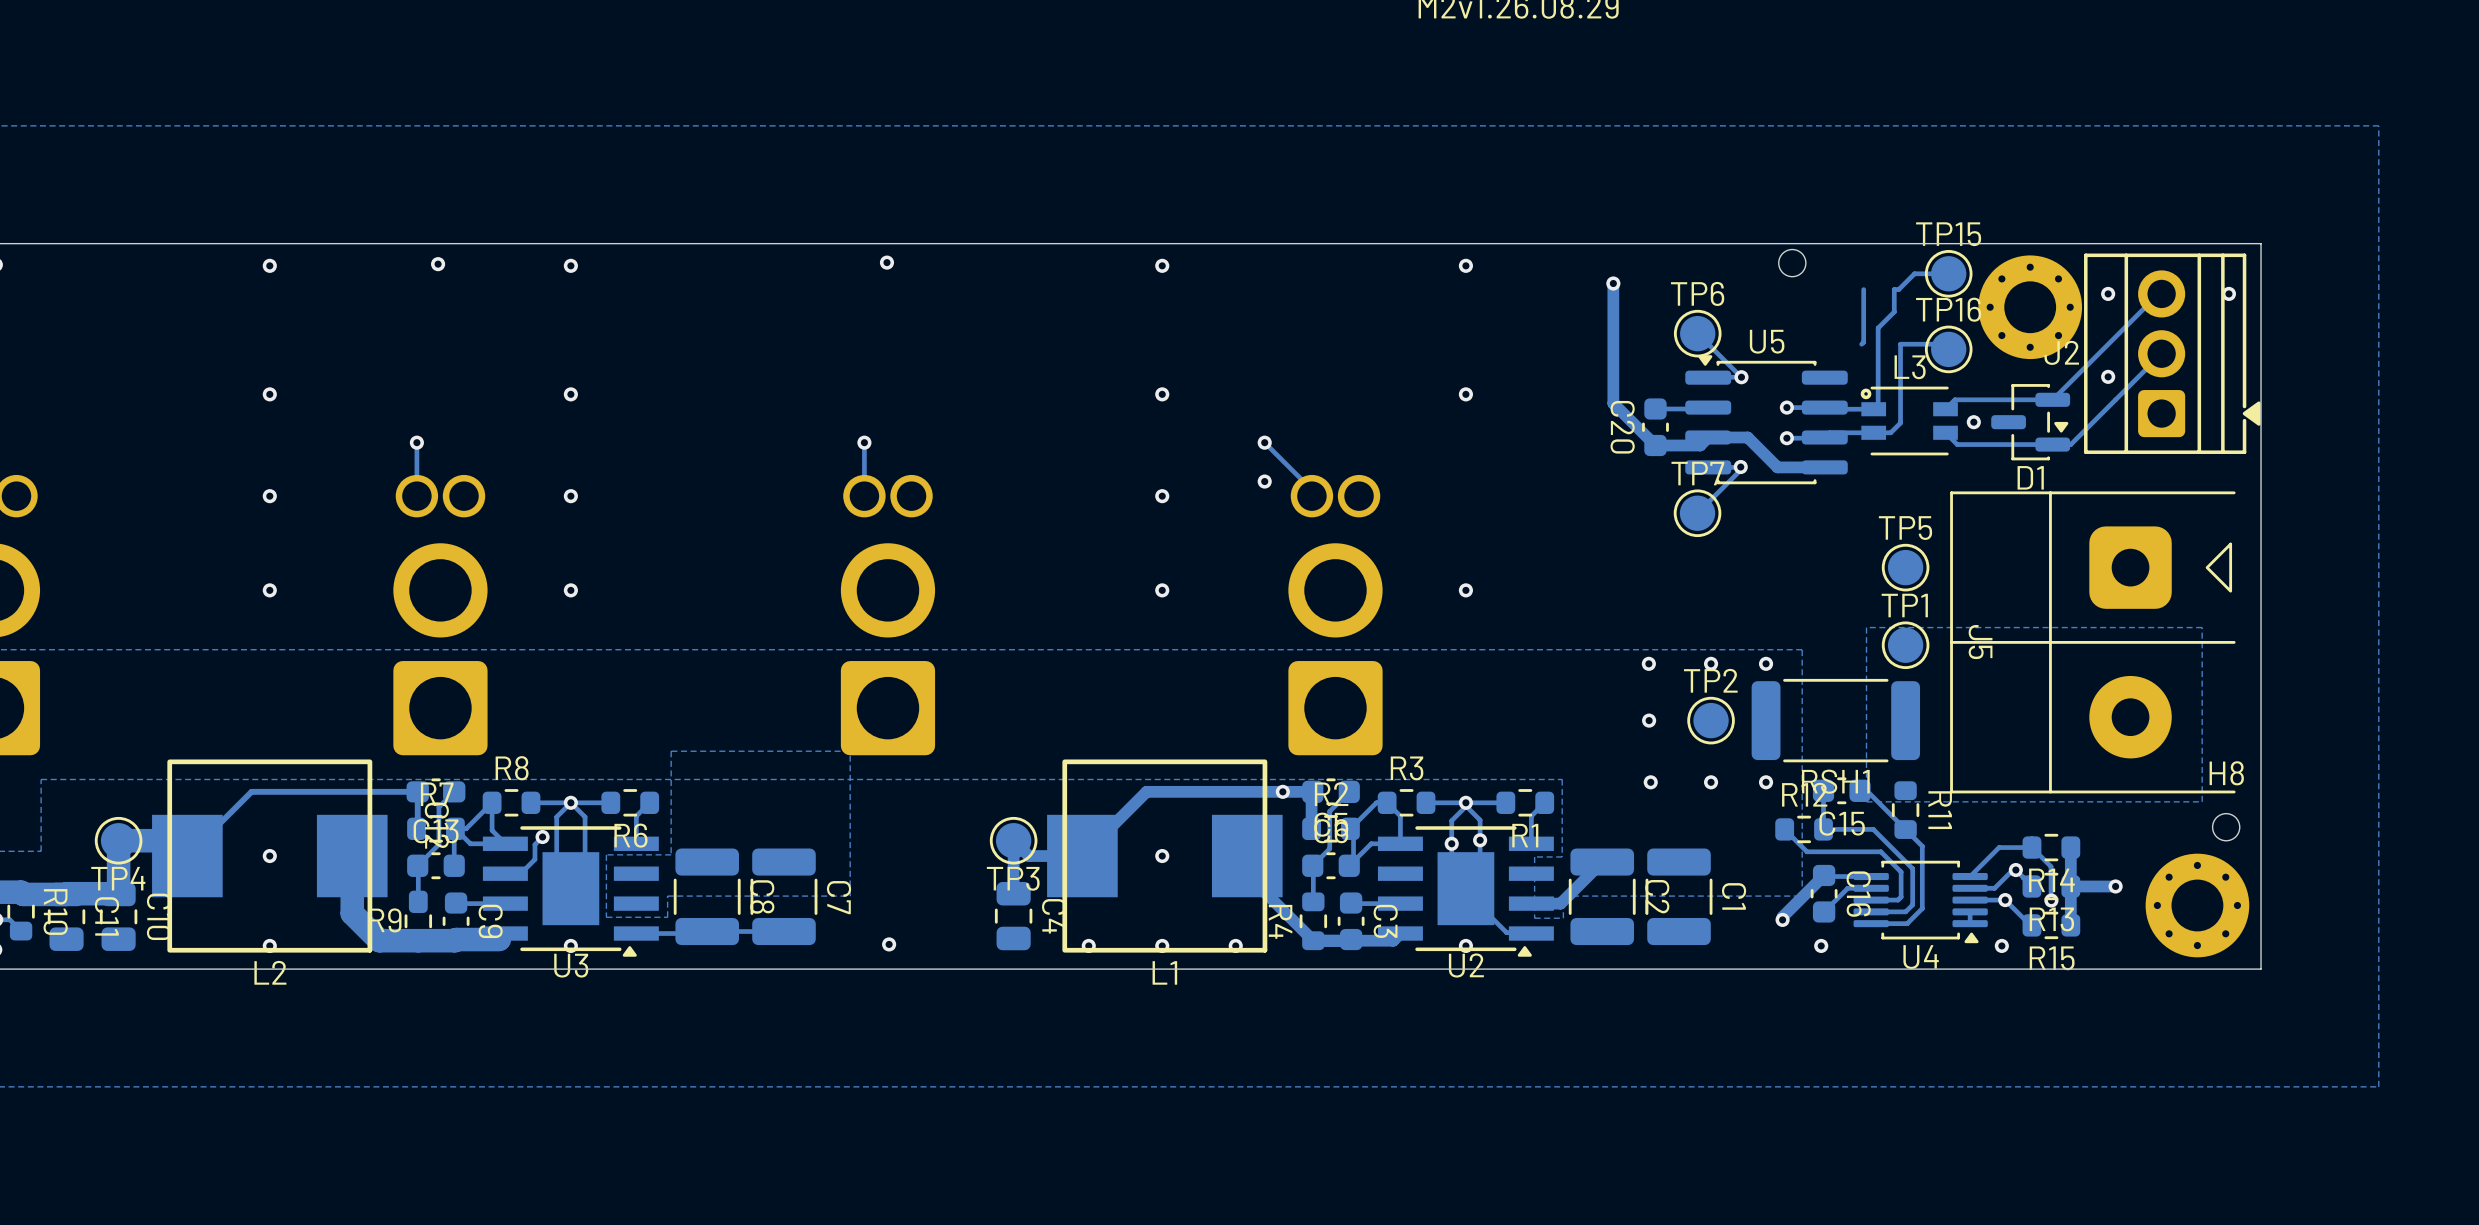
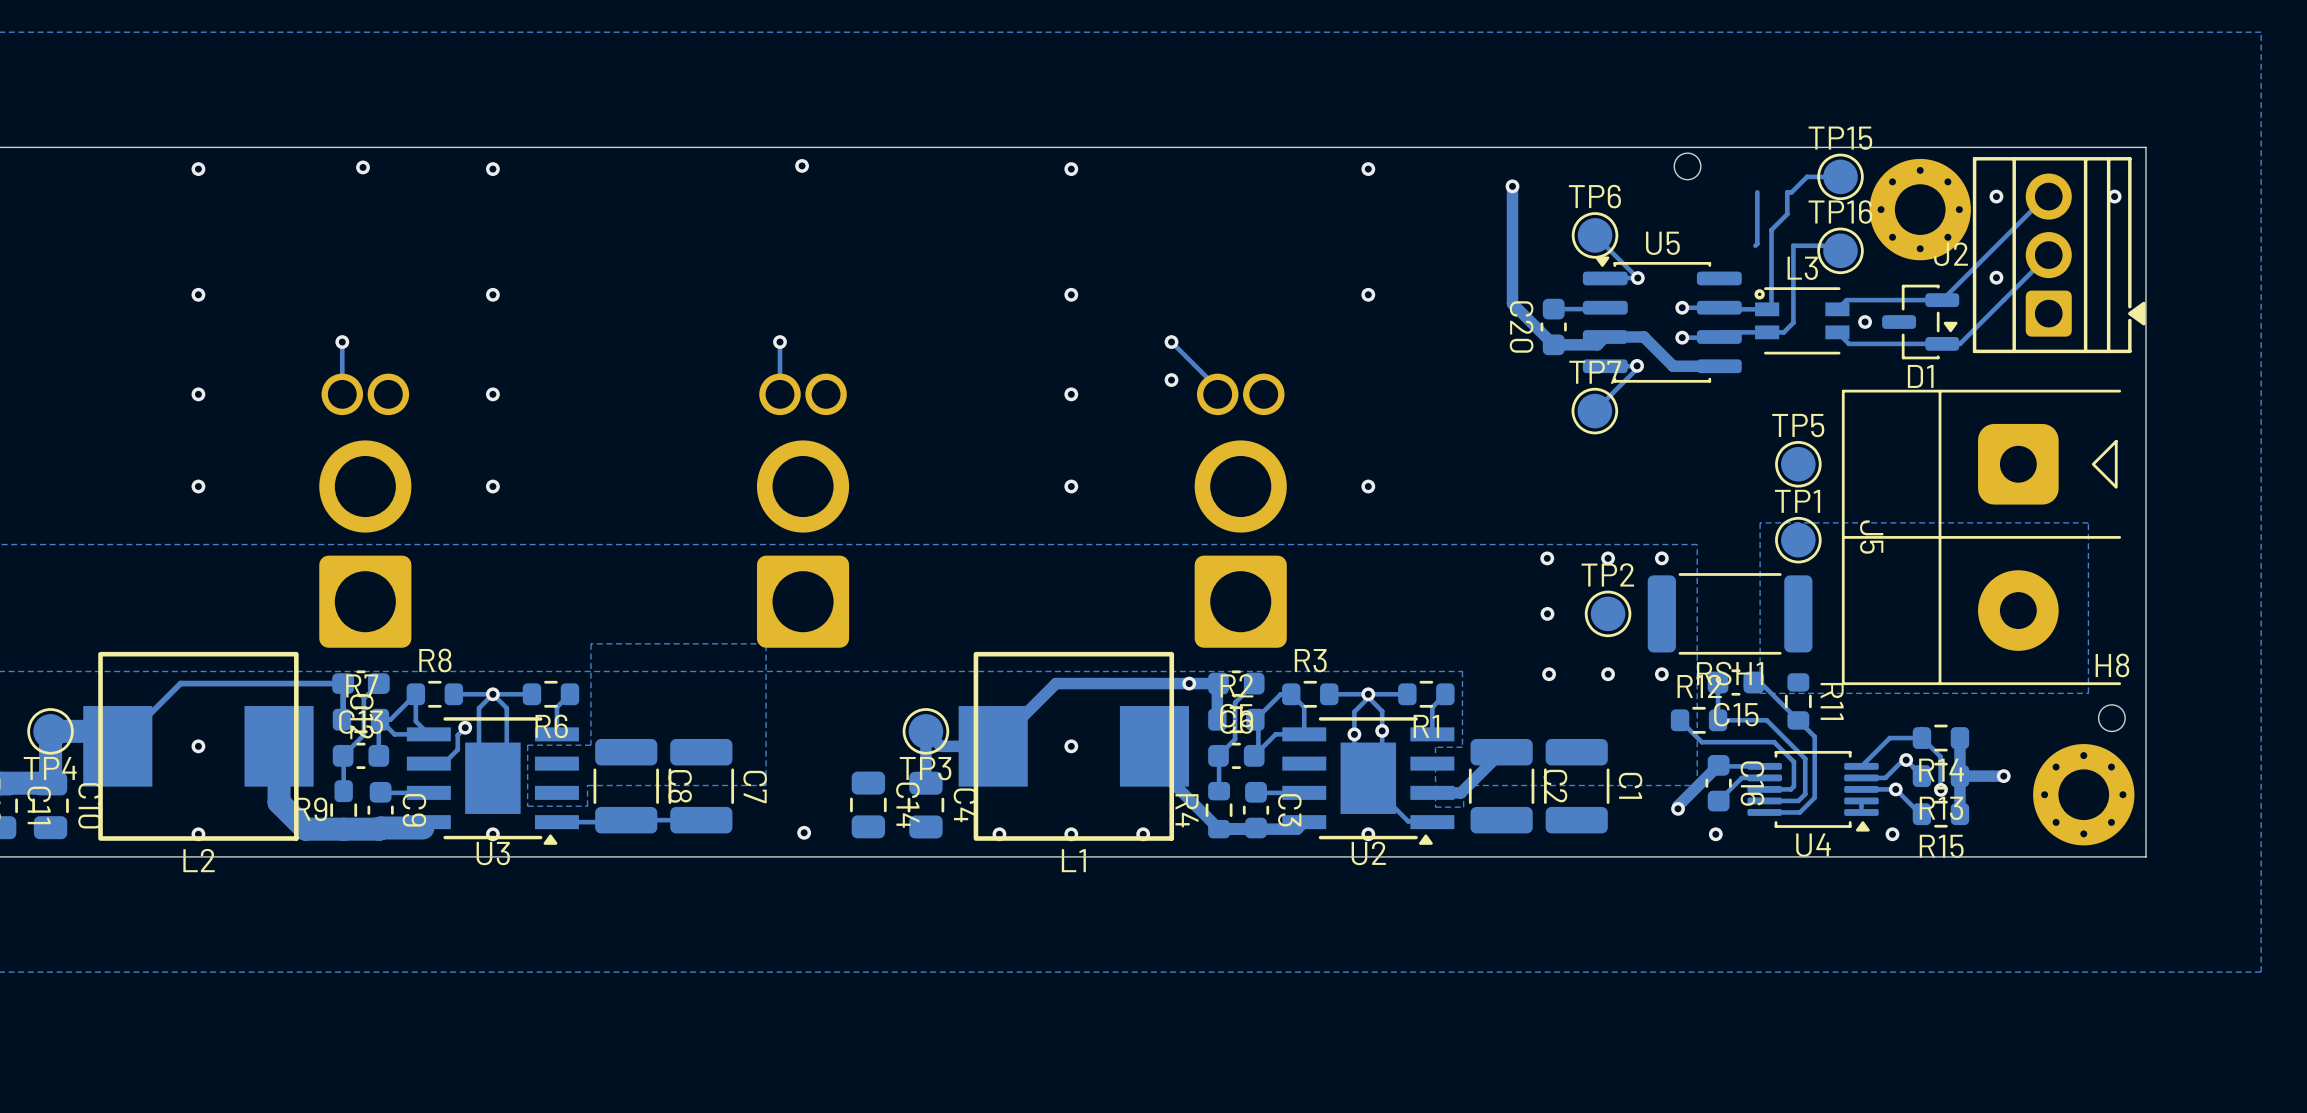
C14: none -> (868, 804)

